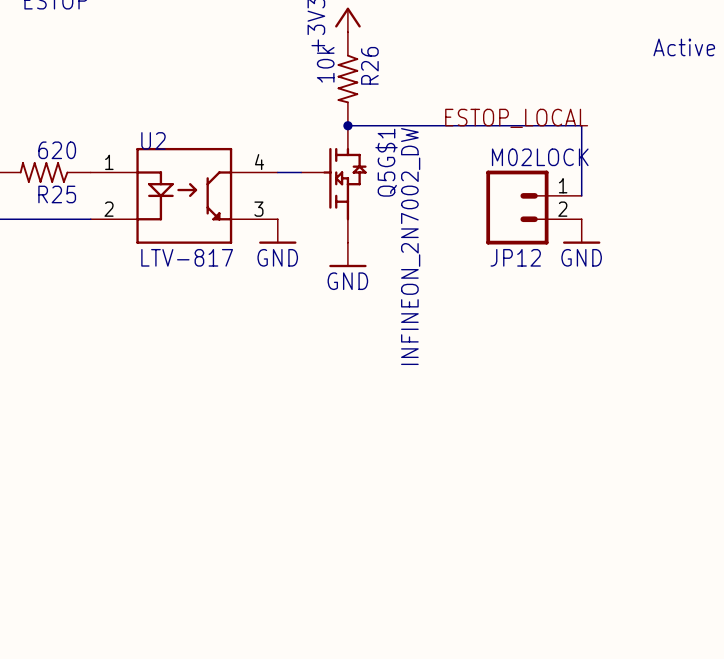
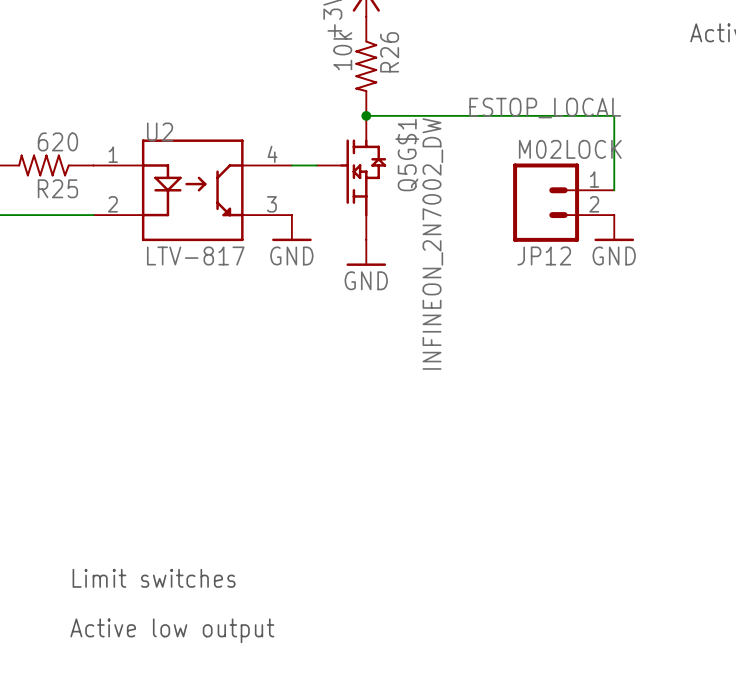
text: none -> Limit switches (154, 578)
text: none -> Active low output (172, 630)

